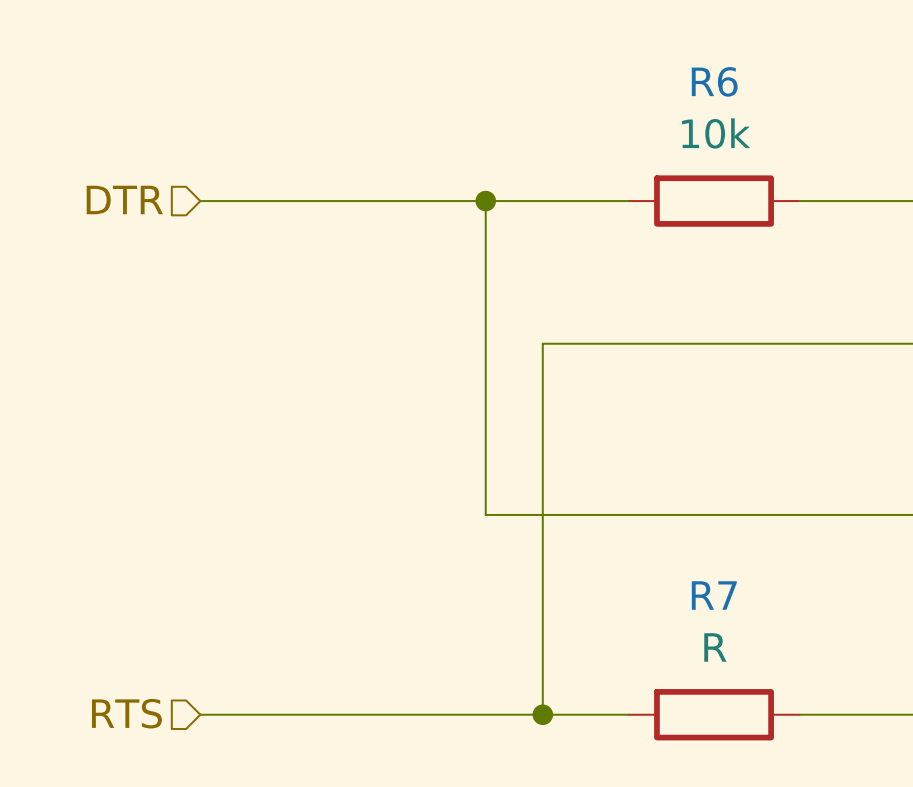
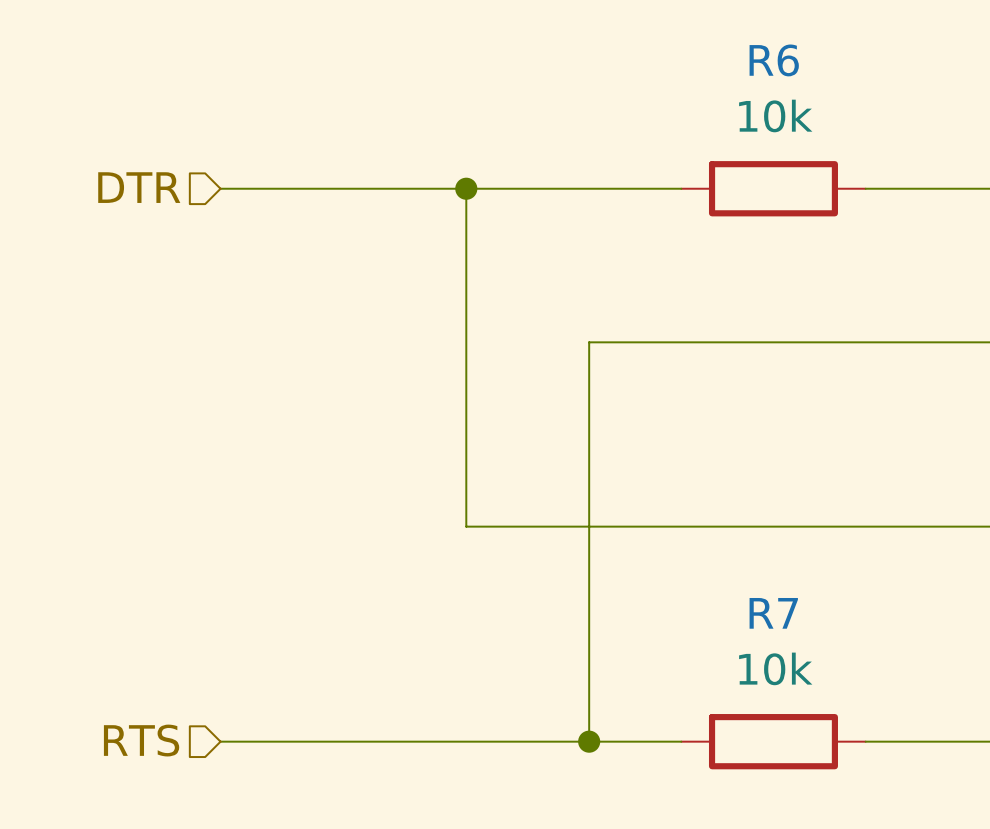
wire: (485, 201) (485, 514) -> (466, 188) (466, 526) (527, 526)
junction position: (485, 201) -> (466, 188)
R7 value: R (715, 647) -> 10k (775, 668)

